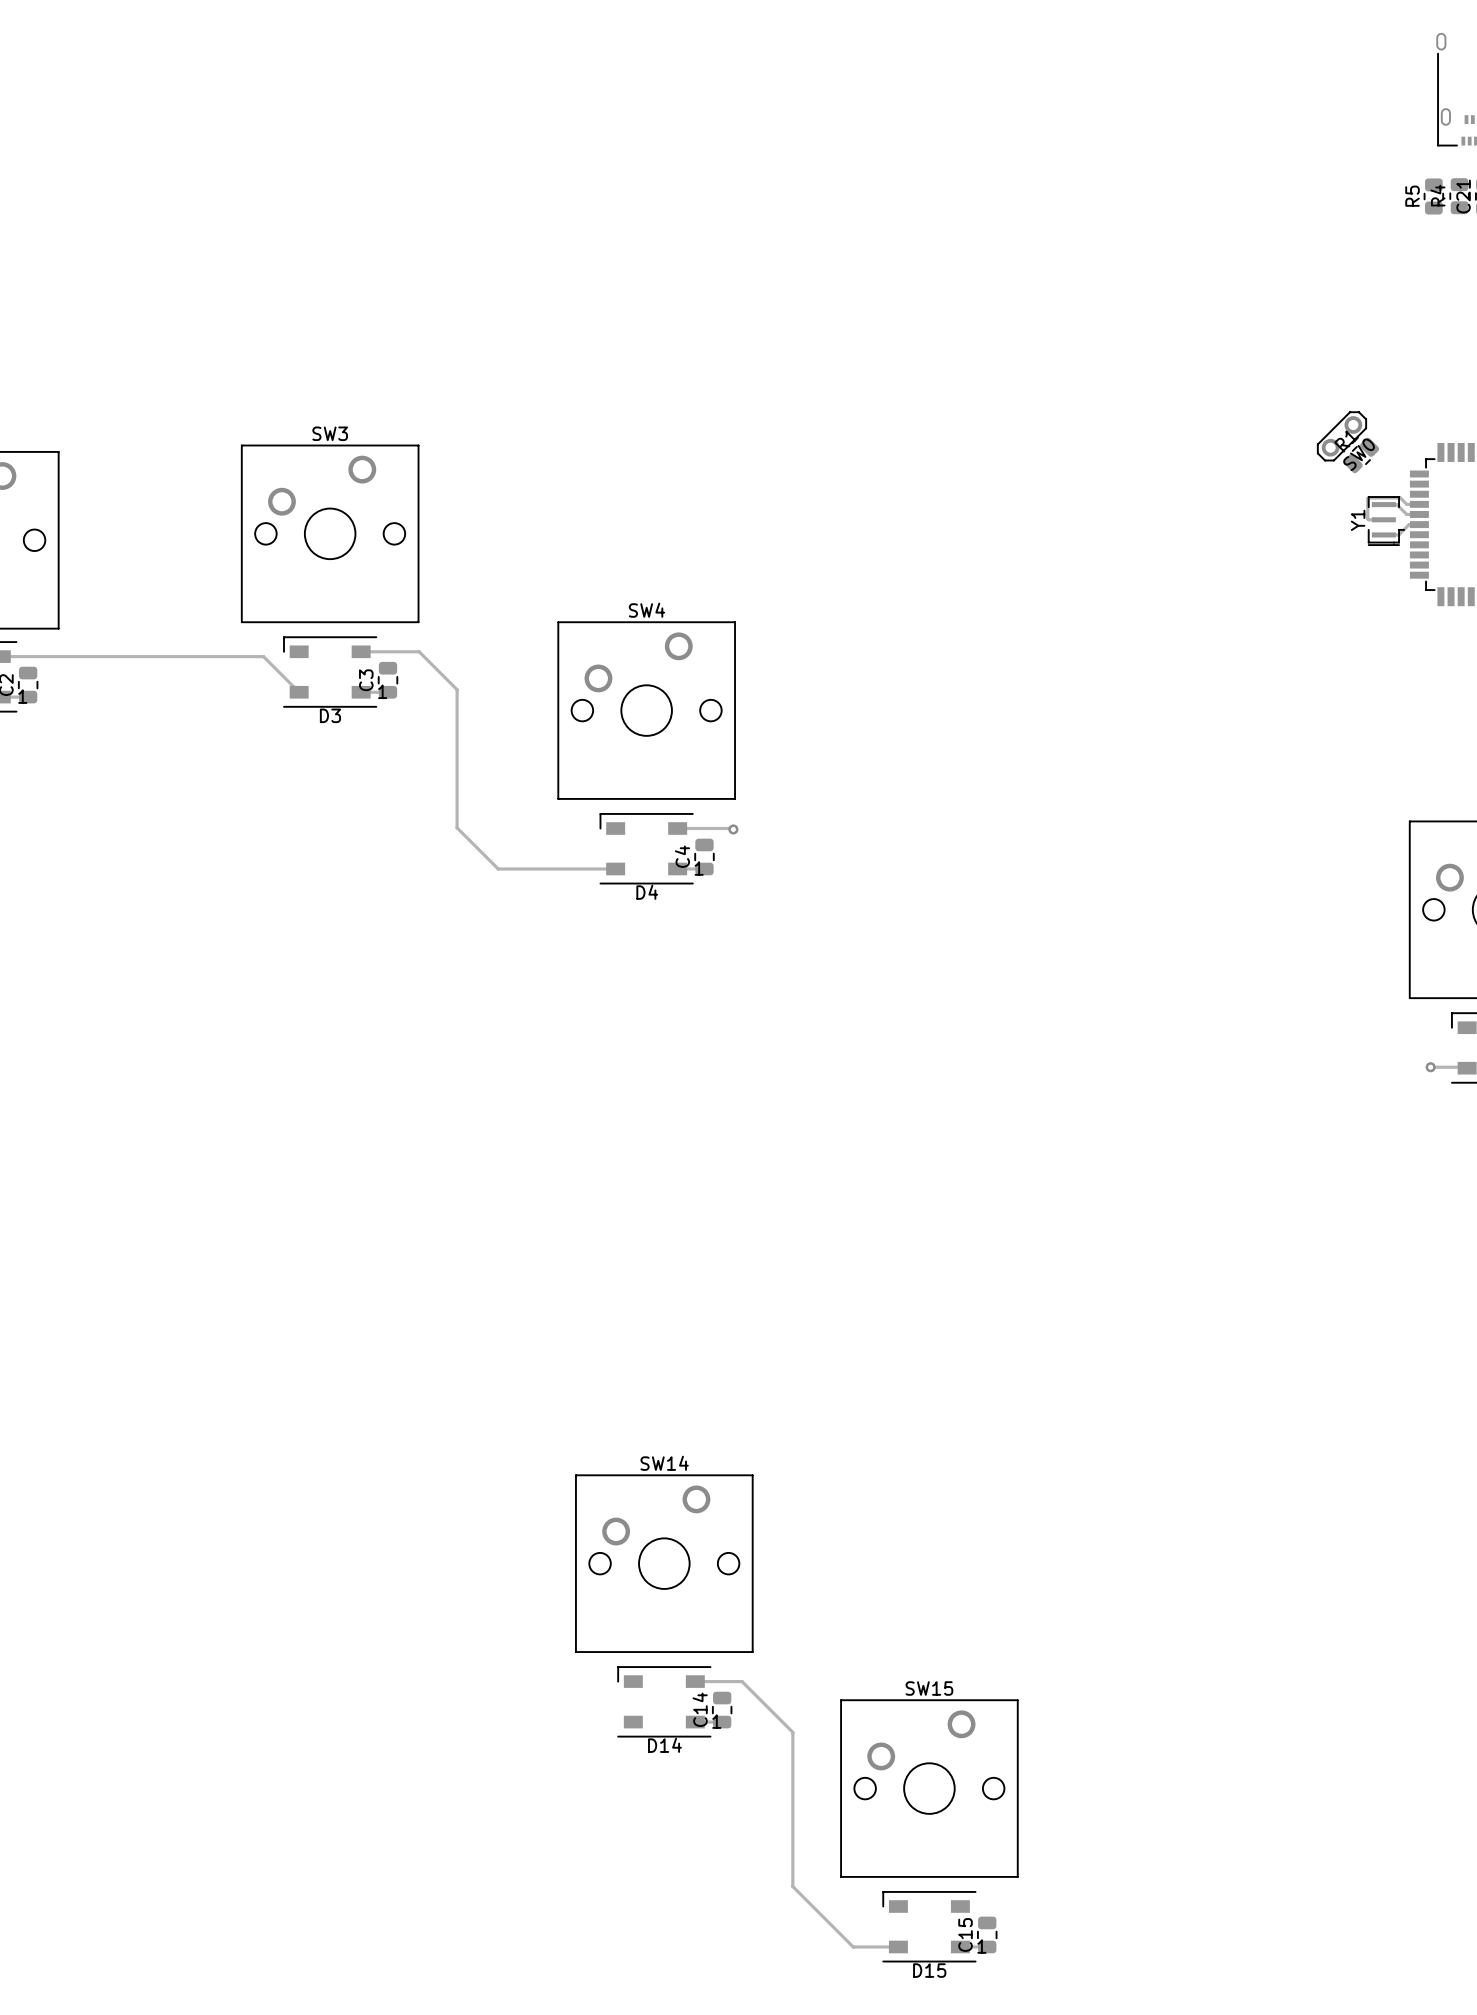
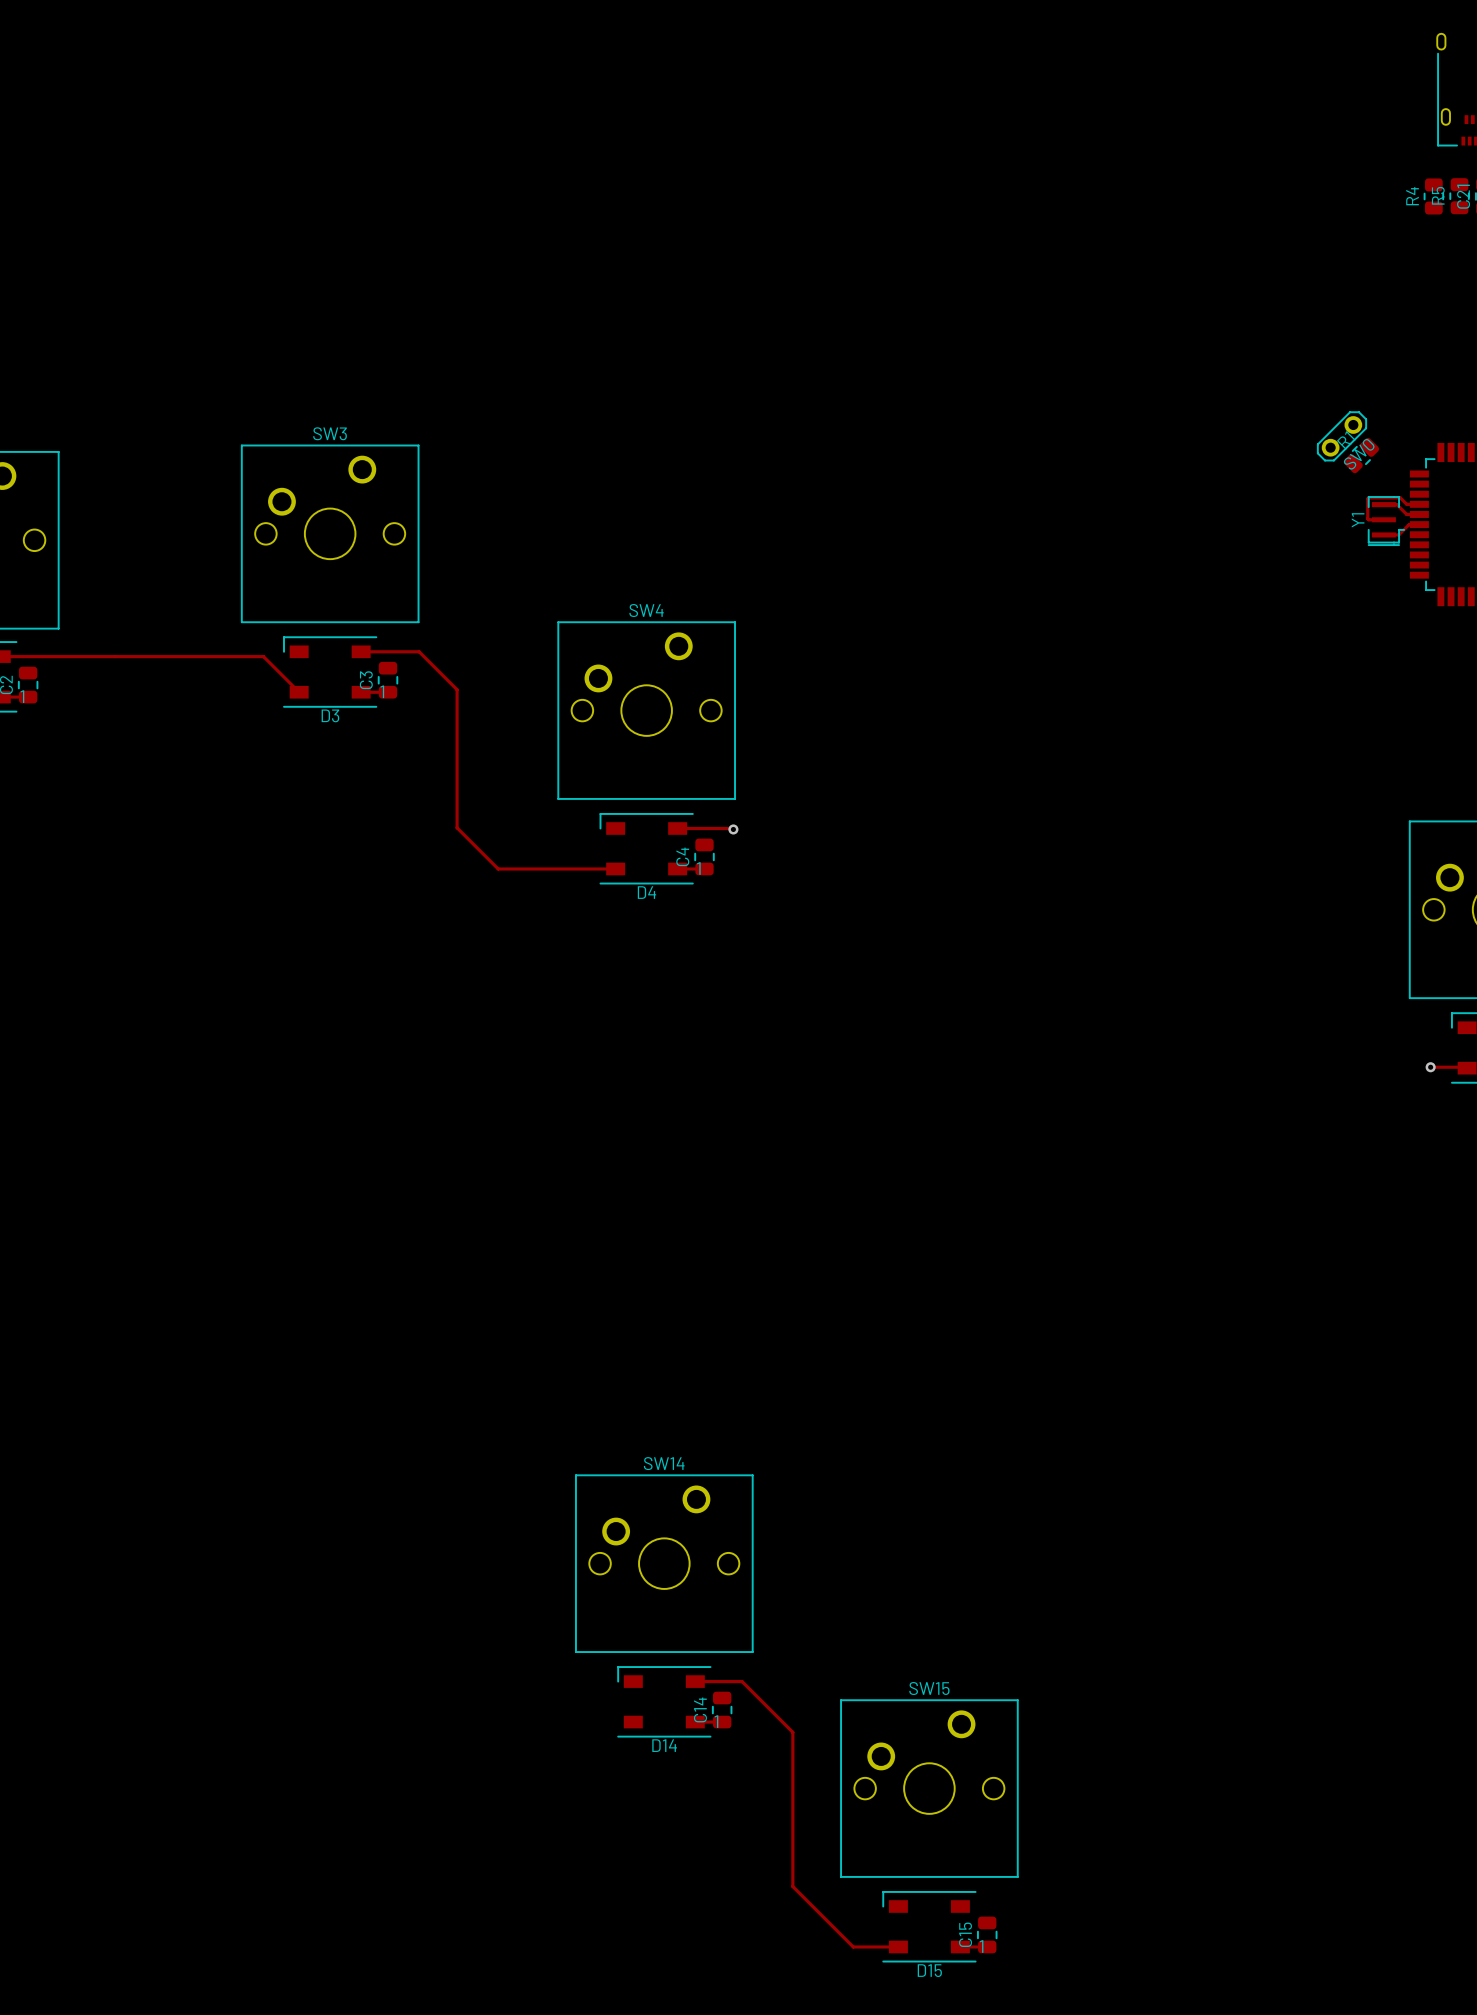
R4 name: R4 (1437, 195) -> R5 (1438, 195)
R5 name: R5 (1412, 196) -> R4 (1412, 196)

